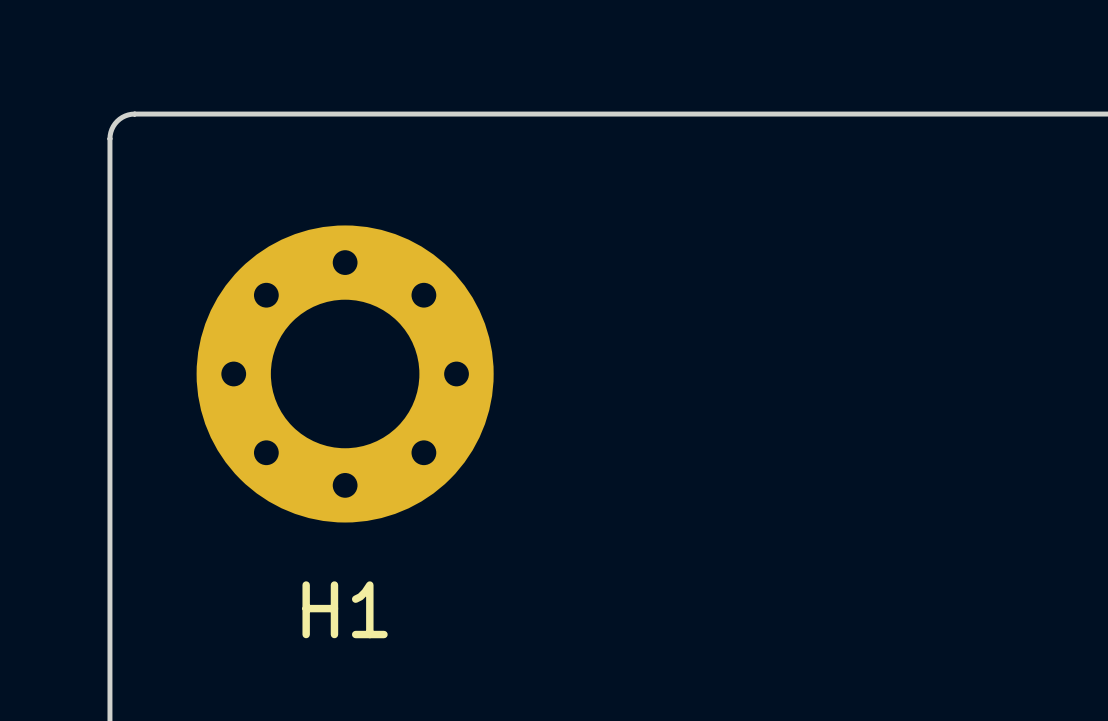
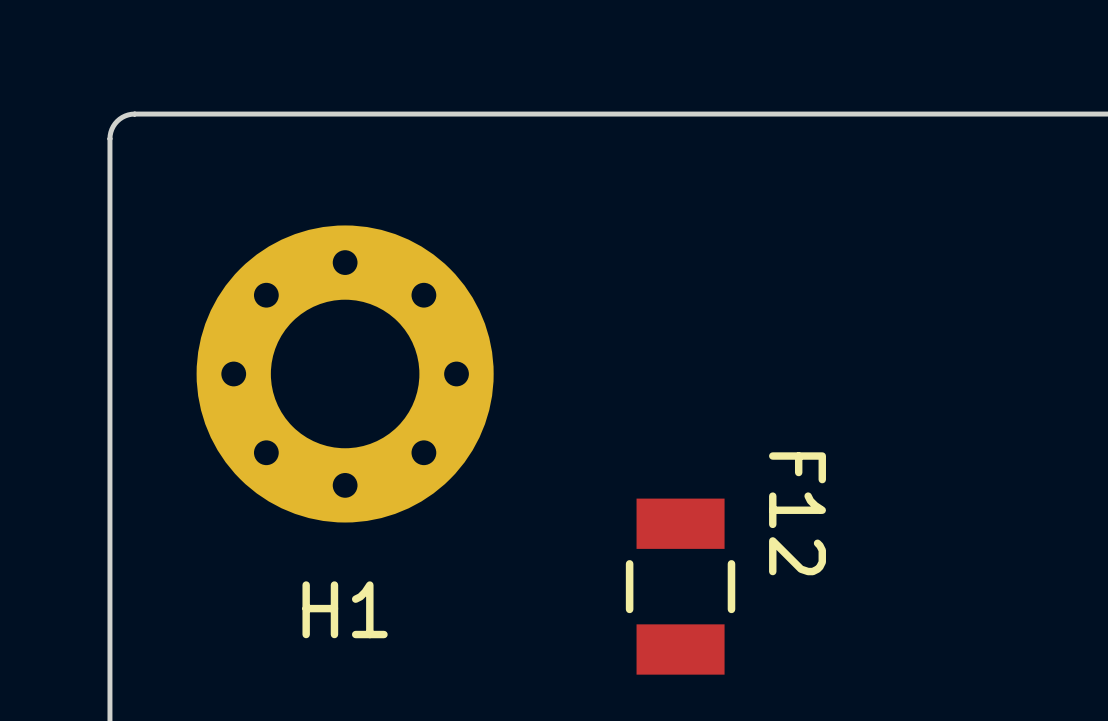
F12: none -> (680, 586)

